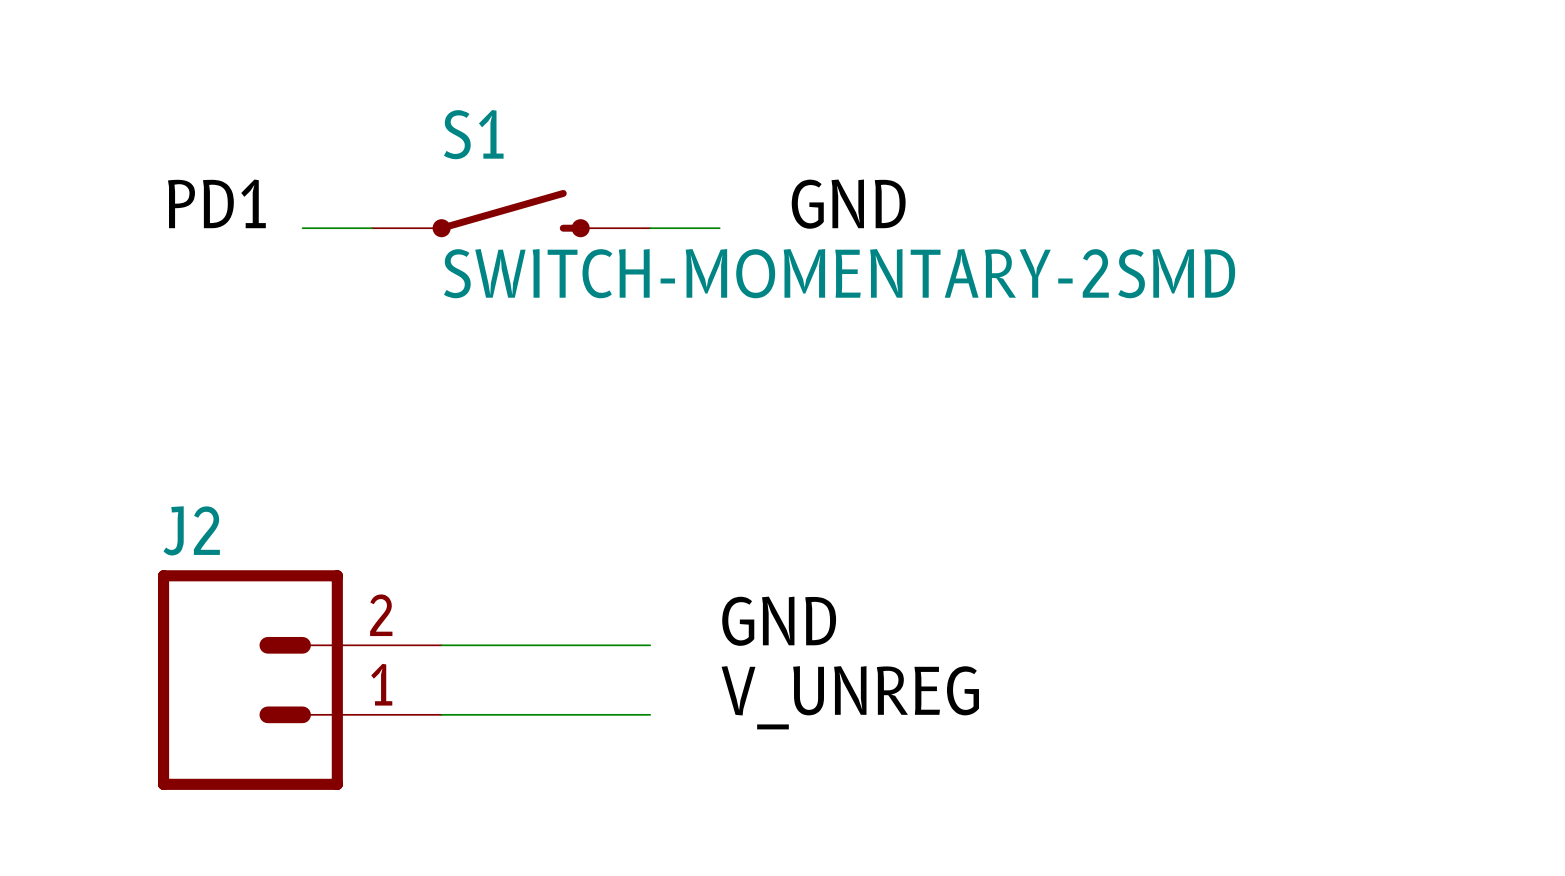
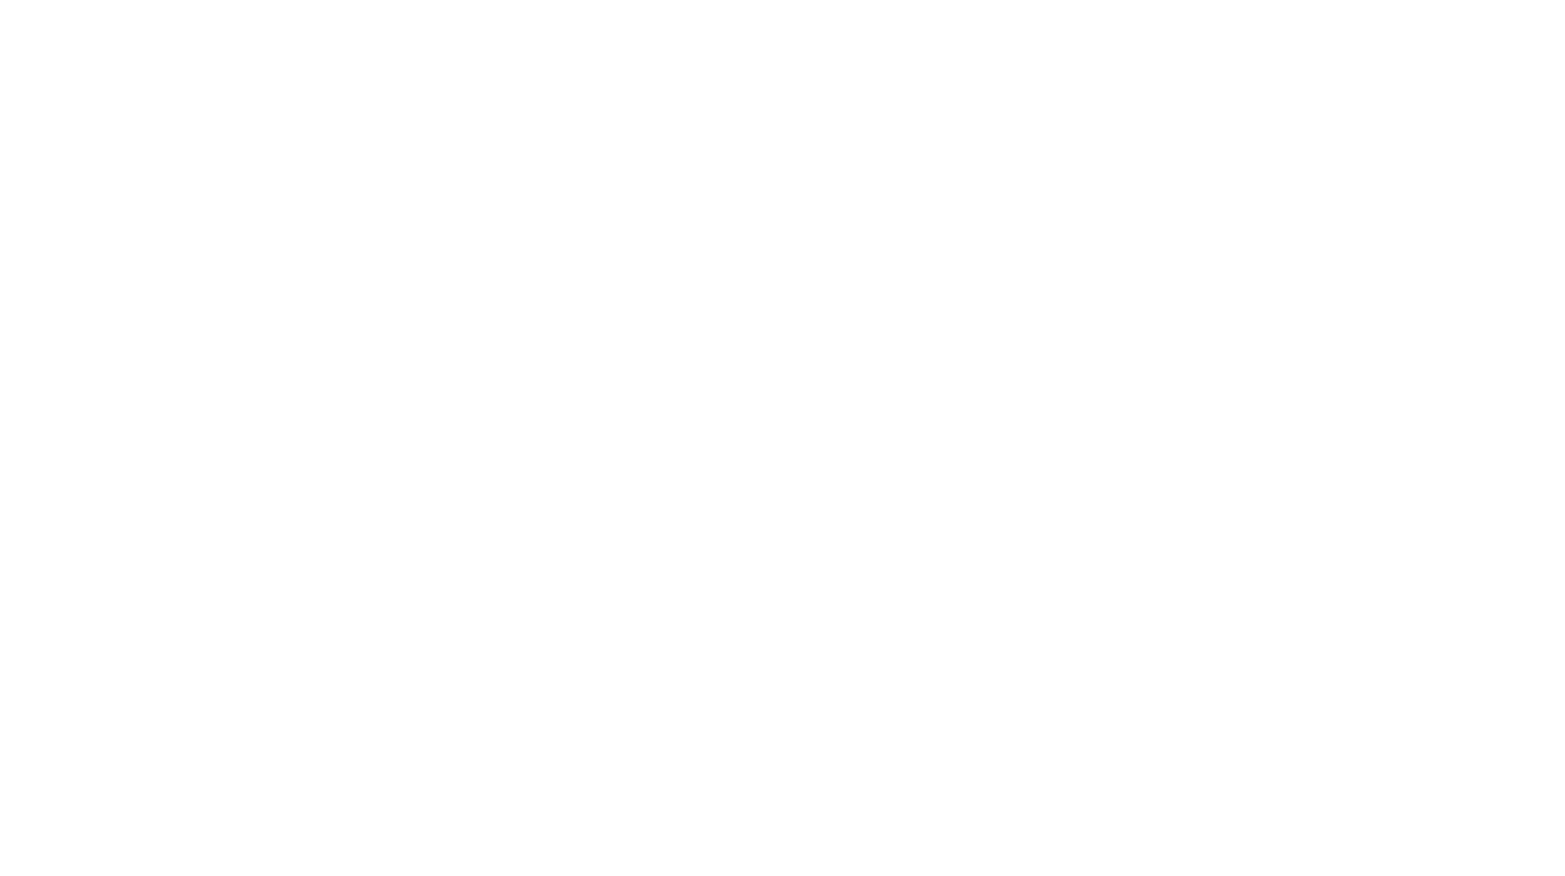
label: PD1 (216, 203) -> none
label: GND (848, 204) -> none
S1: SWITCH-MOMENTARY-2SMD (511, 213) -> none
wire: (302, 228) (372, 228) -> none
wire: (650, 228) (719, 228) -> none
label: GND (779, 621) -> none
wire: (441, 645) (650, 645) -> none
J2: (299, 680) -> none
label: V_UNREG (850, 697) -> none
wire: (441, 714) (650, 714) -> none

